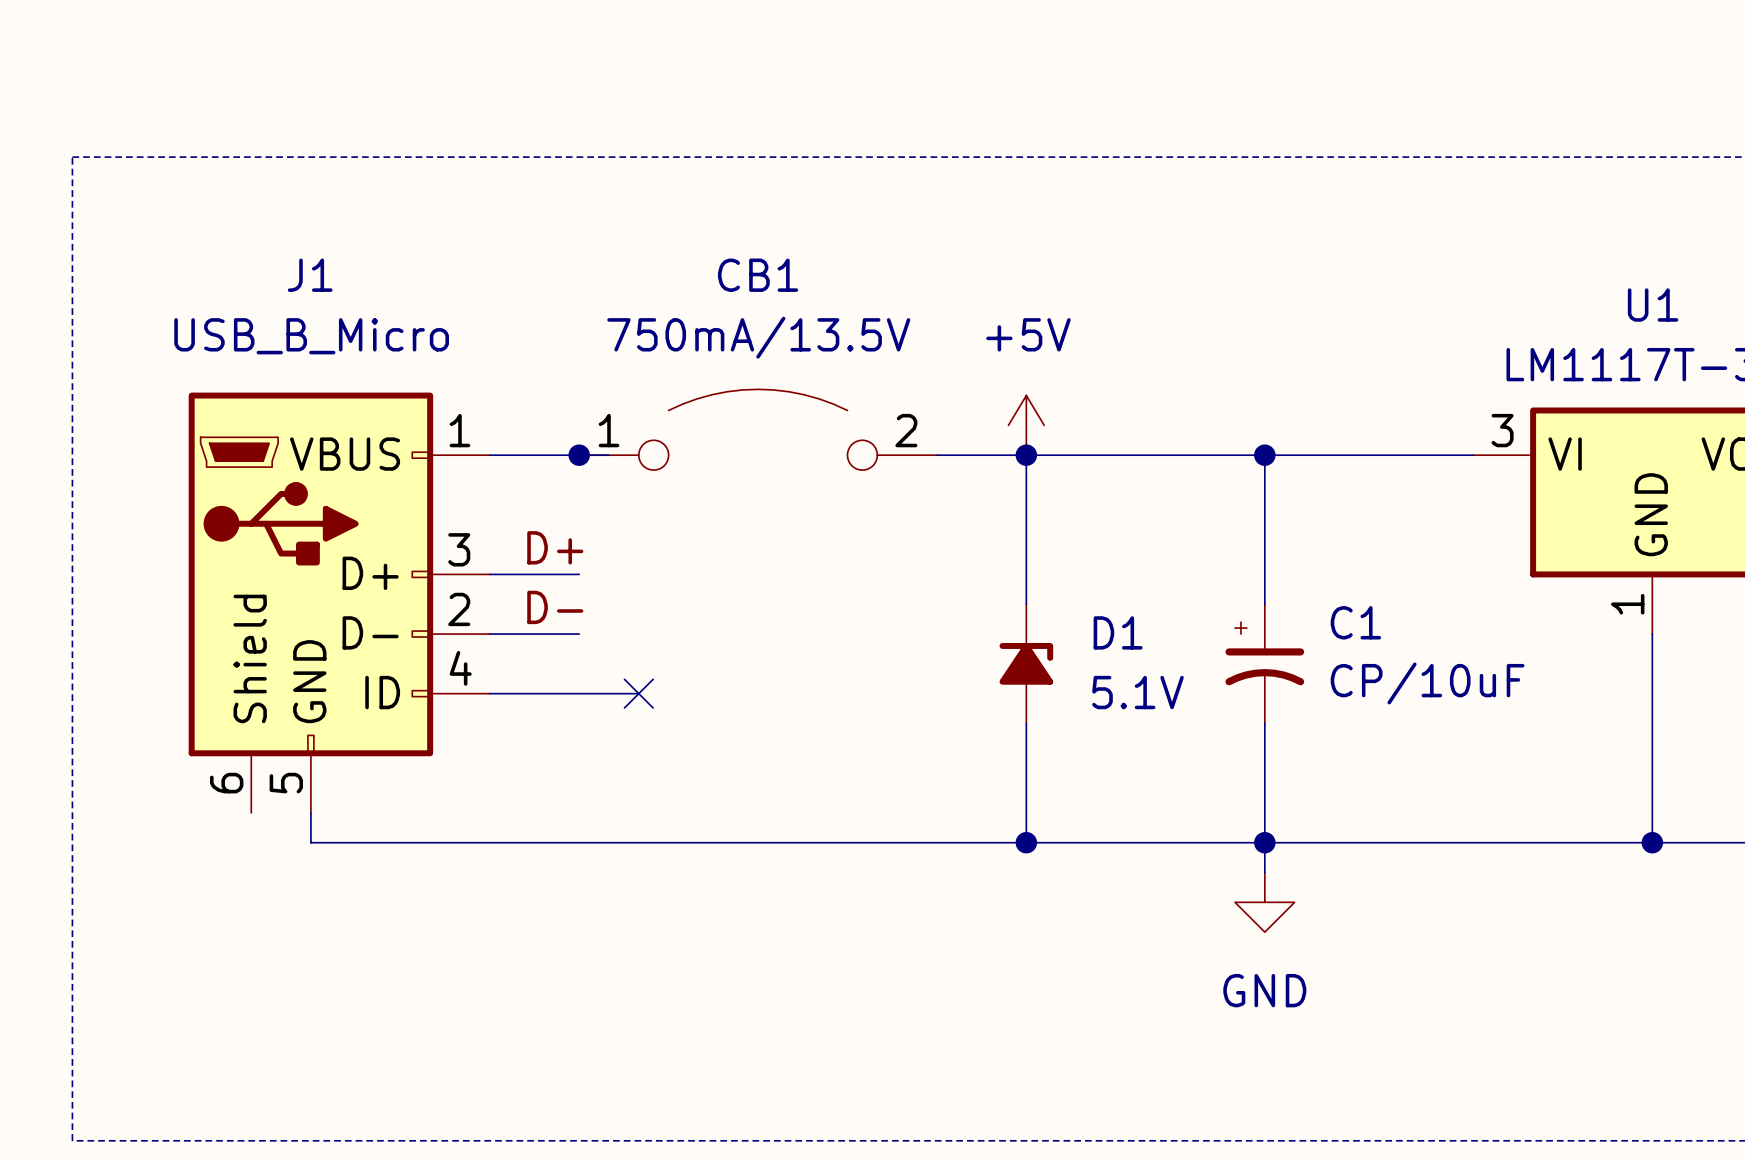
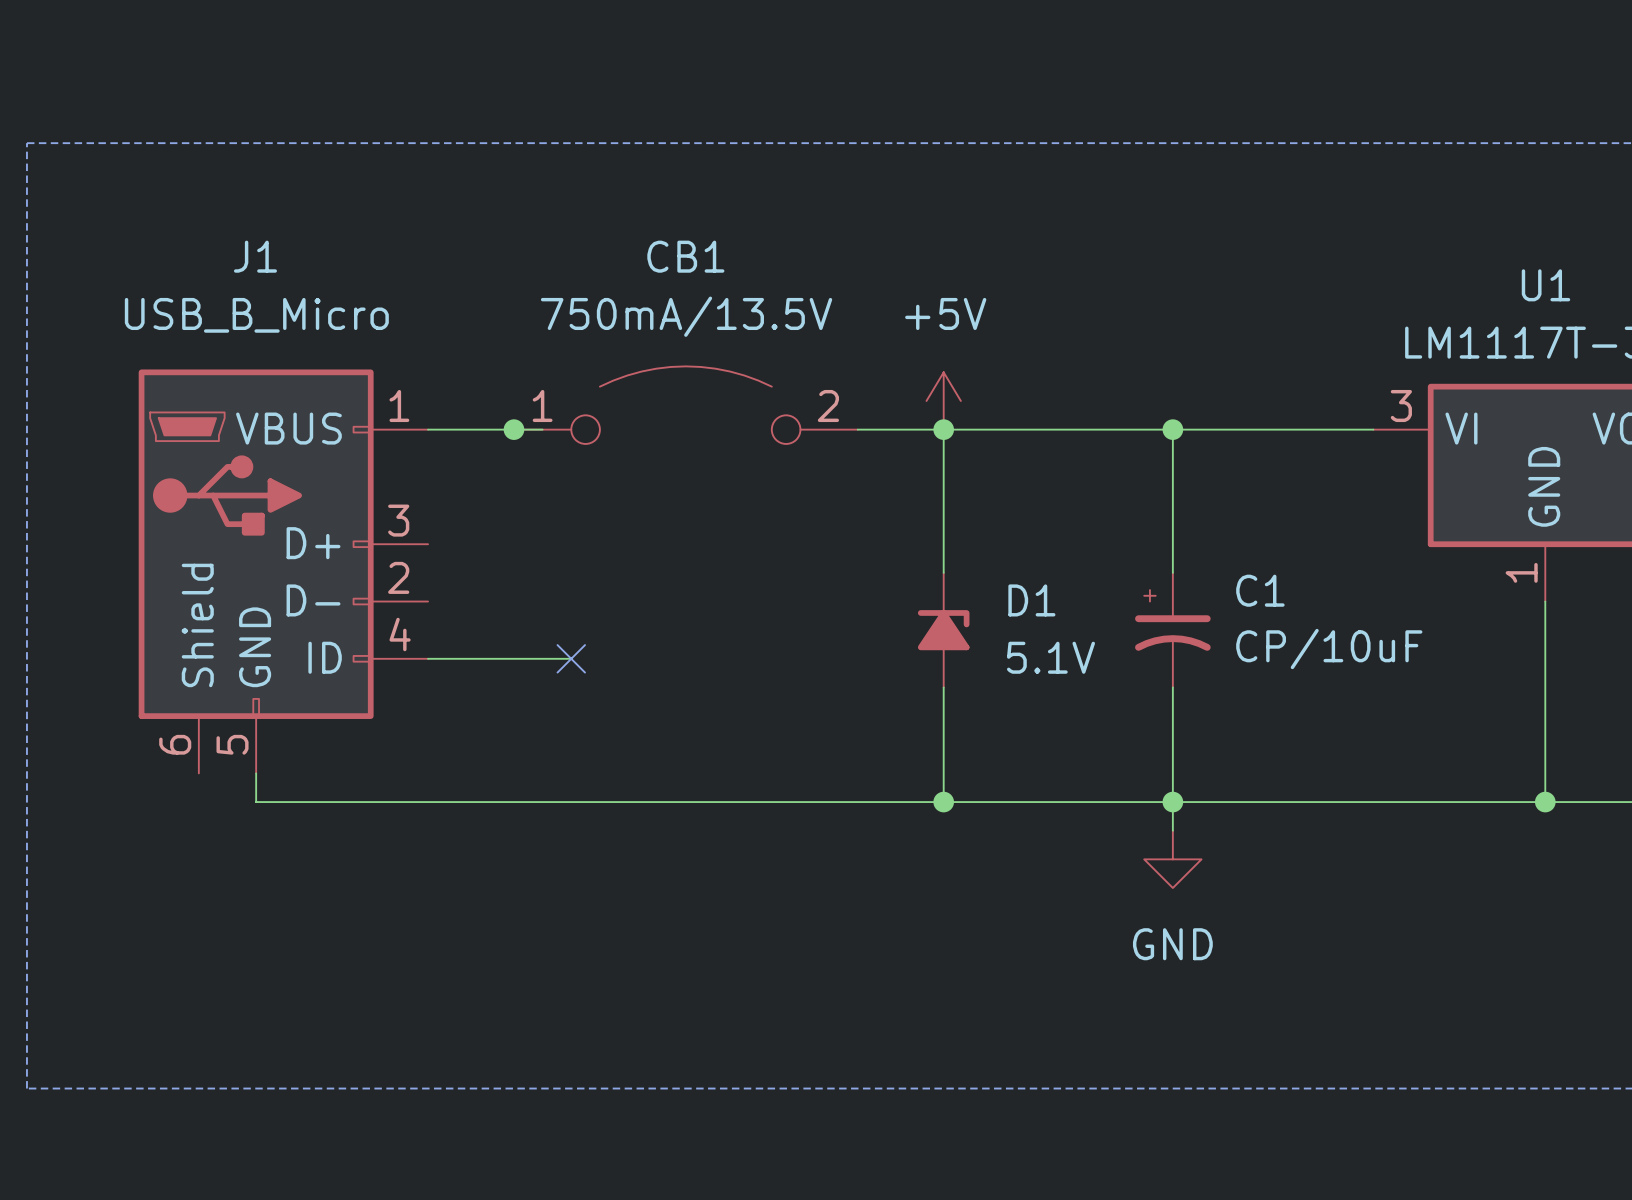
label: D+ (555, 547) -> none
wire: (489, 574) (579, 574) -> none
label: D- (555, 607) -> none
wire: (489, 634) (579, 634) -> none

